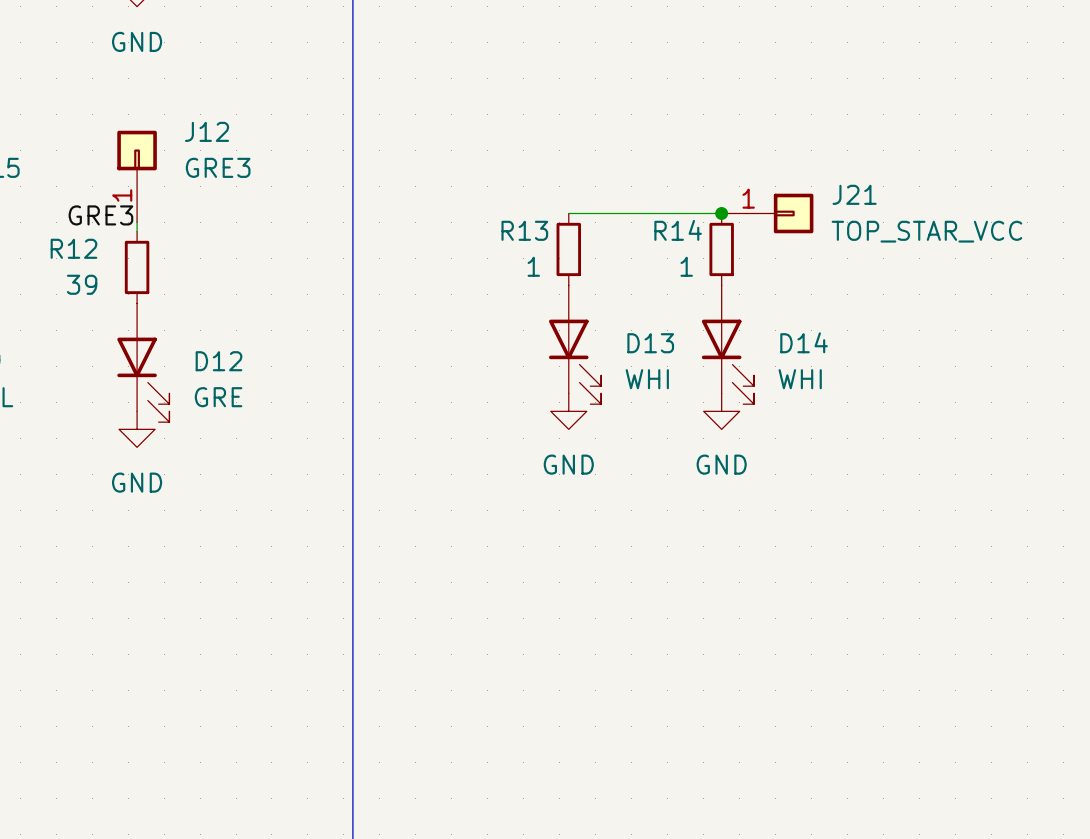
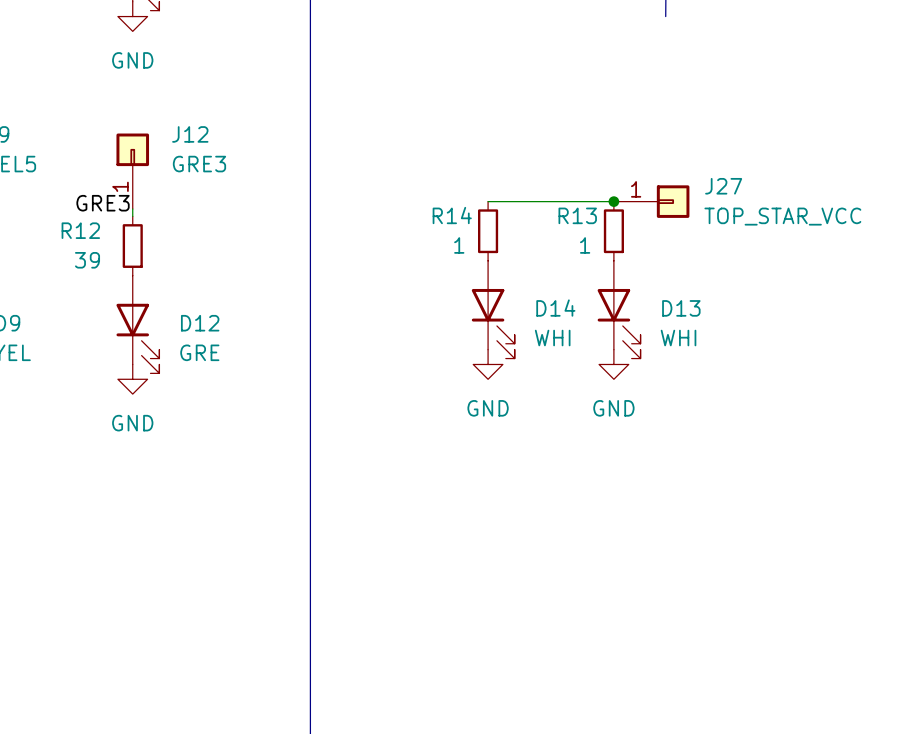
J21 name: J21 (854, 194) -> J27 (723, 186)
R13 name: R13 (524, 230) -> R14 (452, 215)
R14 name: R14 (678, 230) -> R13 (577, 215)
D14 name: D14 (804, 342) -> D13 (681, 308)
D13 name: D13 (650, 343) -> D14 (555, 308)

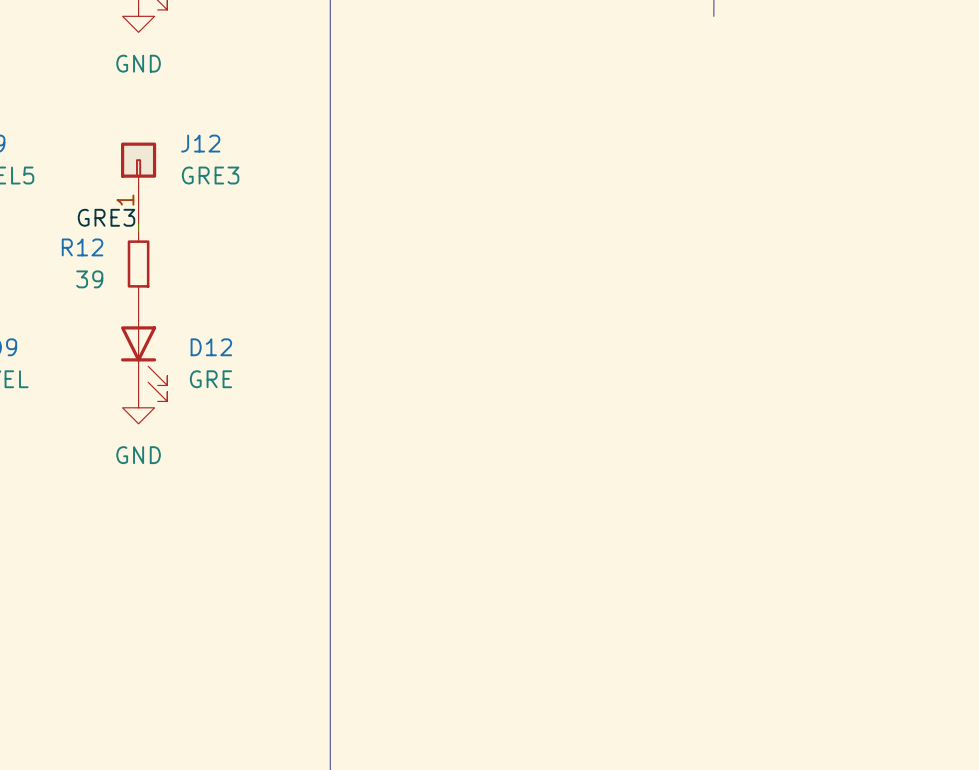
wire: (488, 201) (613, 201) -> none
junction: (613, 201) -> none
J27: TOP_STAR_VCC (651, 201) -> none
R14: 1 (488, 231) -> none
R13: 1 (613, 231) -> none
D14: WHI (493, 309) -> none
D13: WHI (619, 309) -> none
power symbol: GND (488, 364) -> none
power symbol: GND (613, 364) -> none

